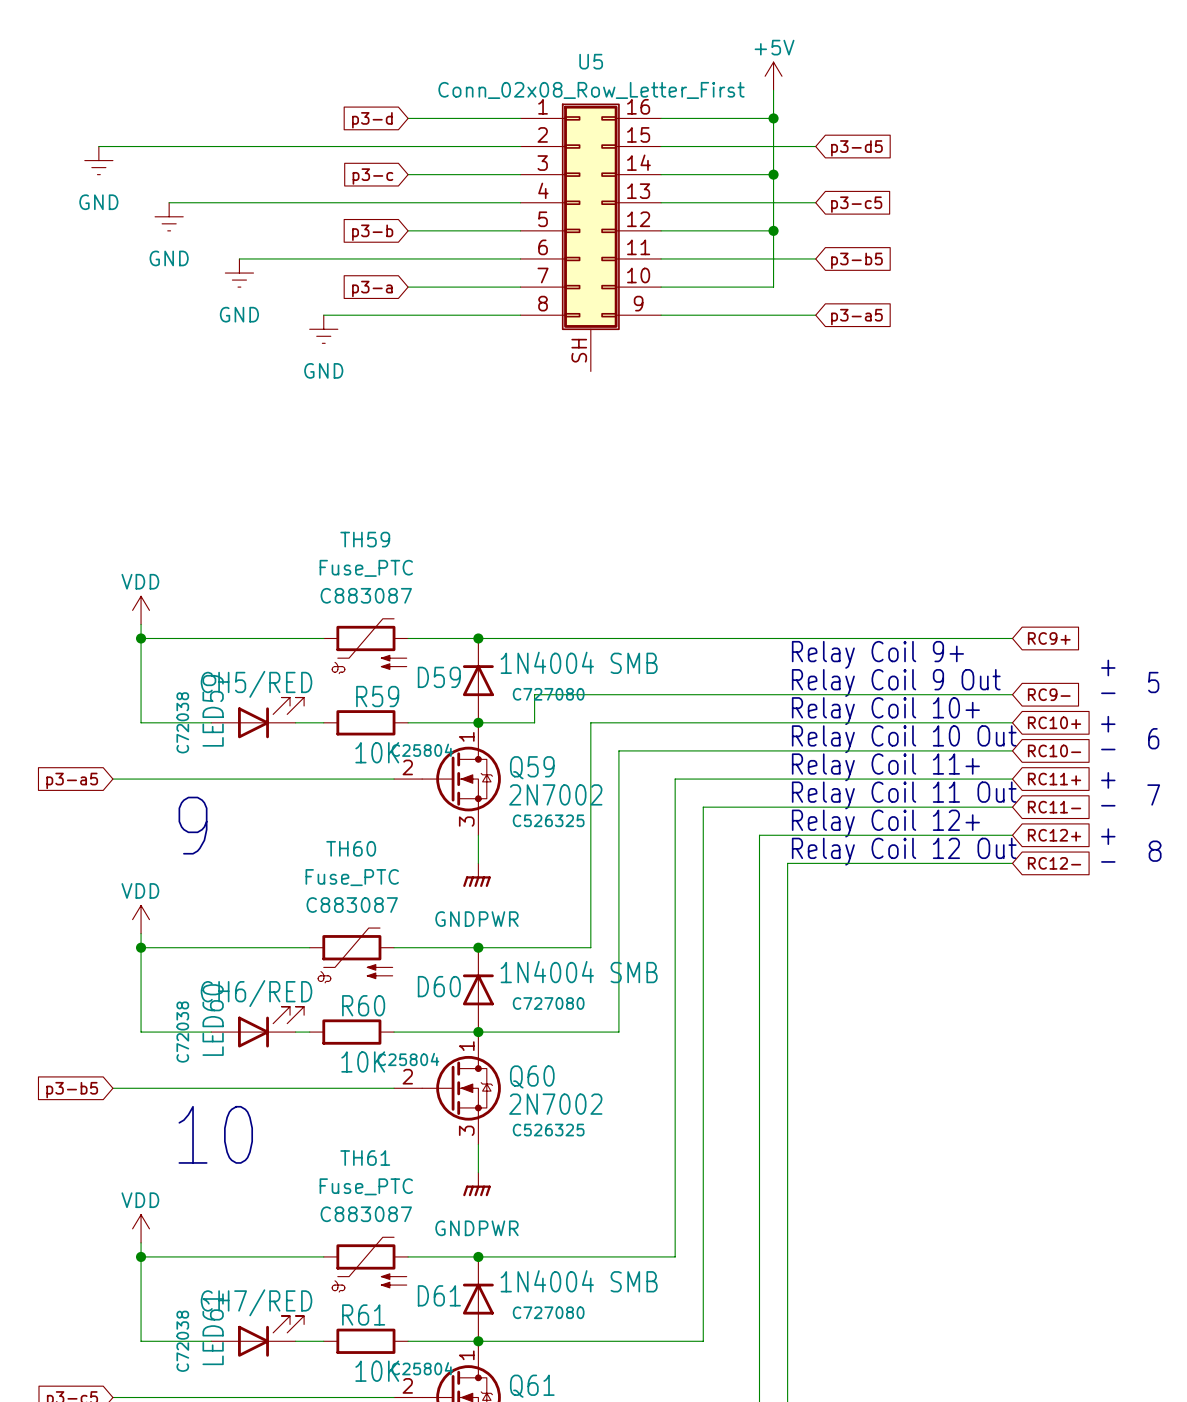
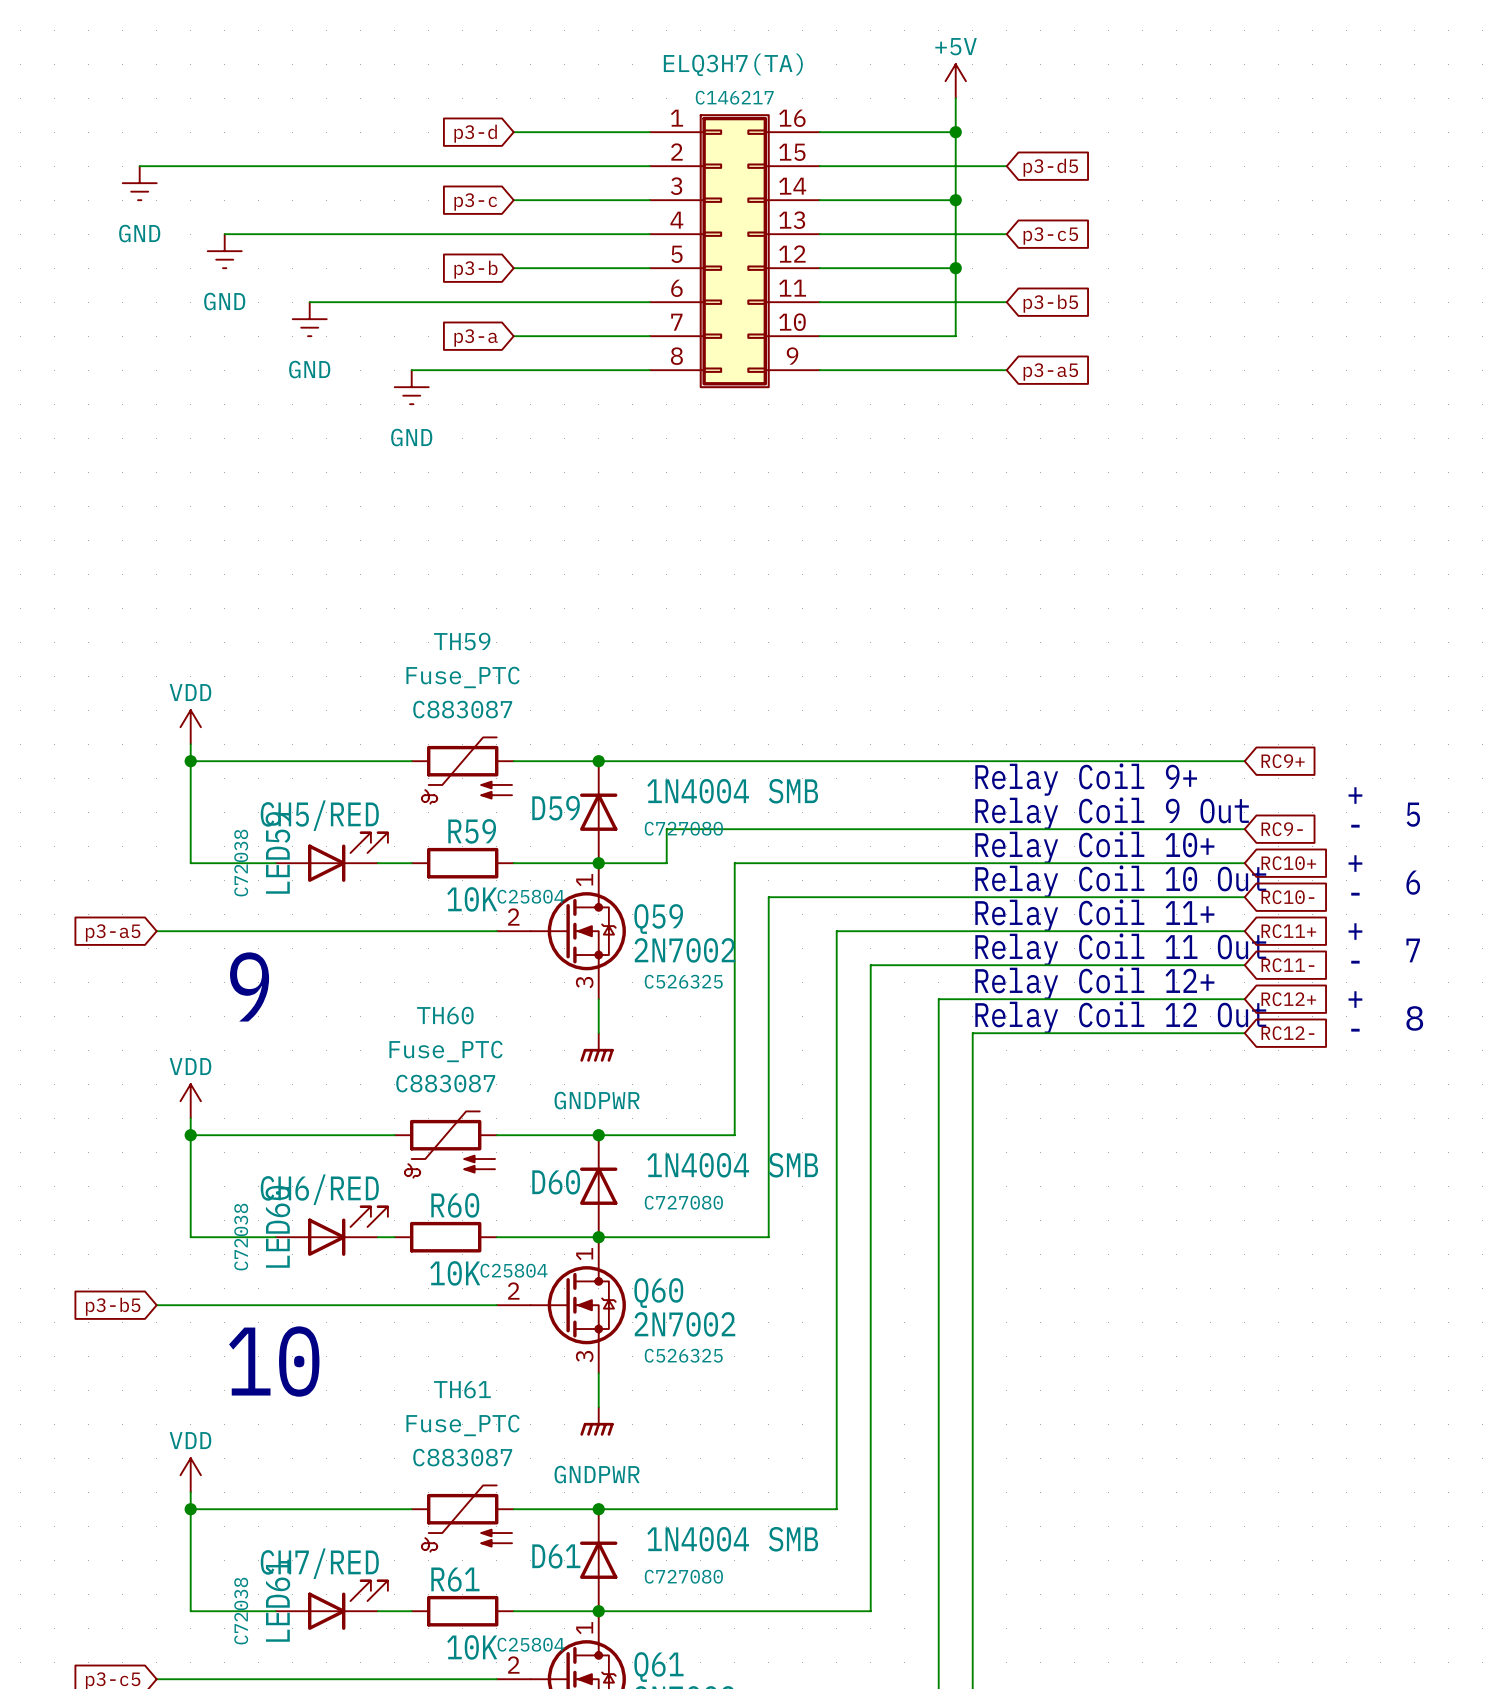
part: none -> ELQ3H7(TA) (734, 251)
U5: Conn_02x08_Row_Letter_First (590, 237) -> none

